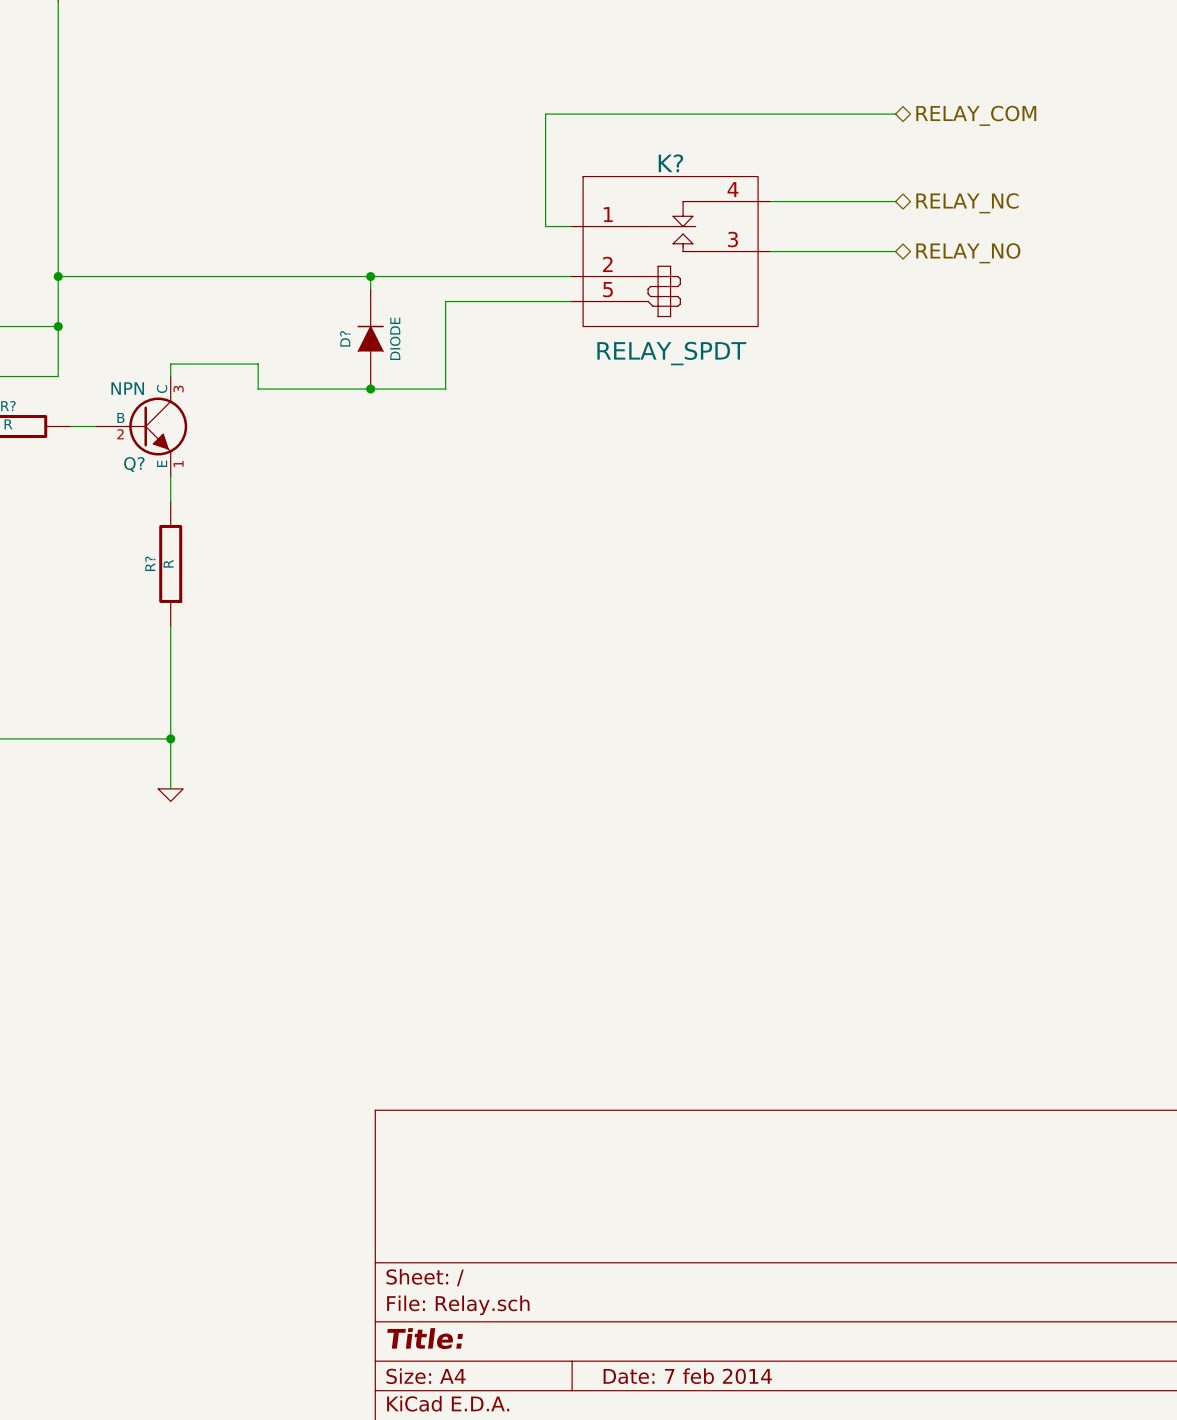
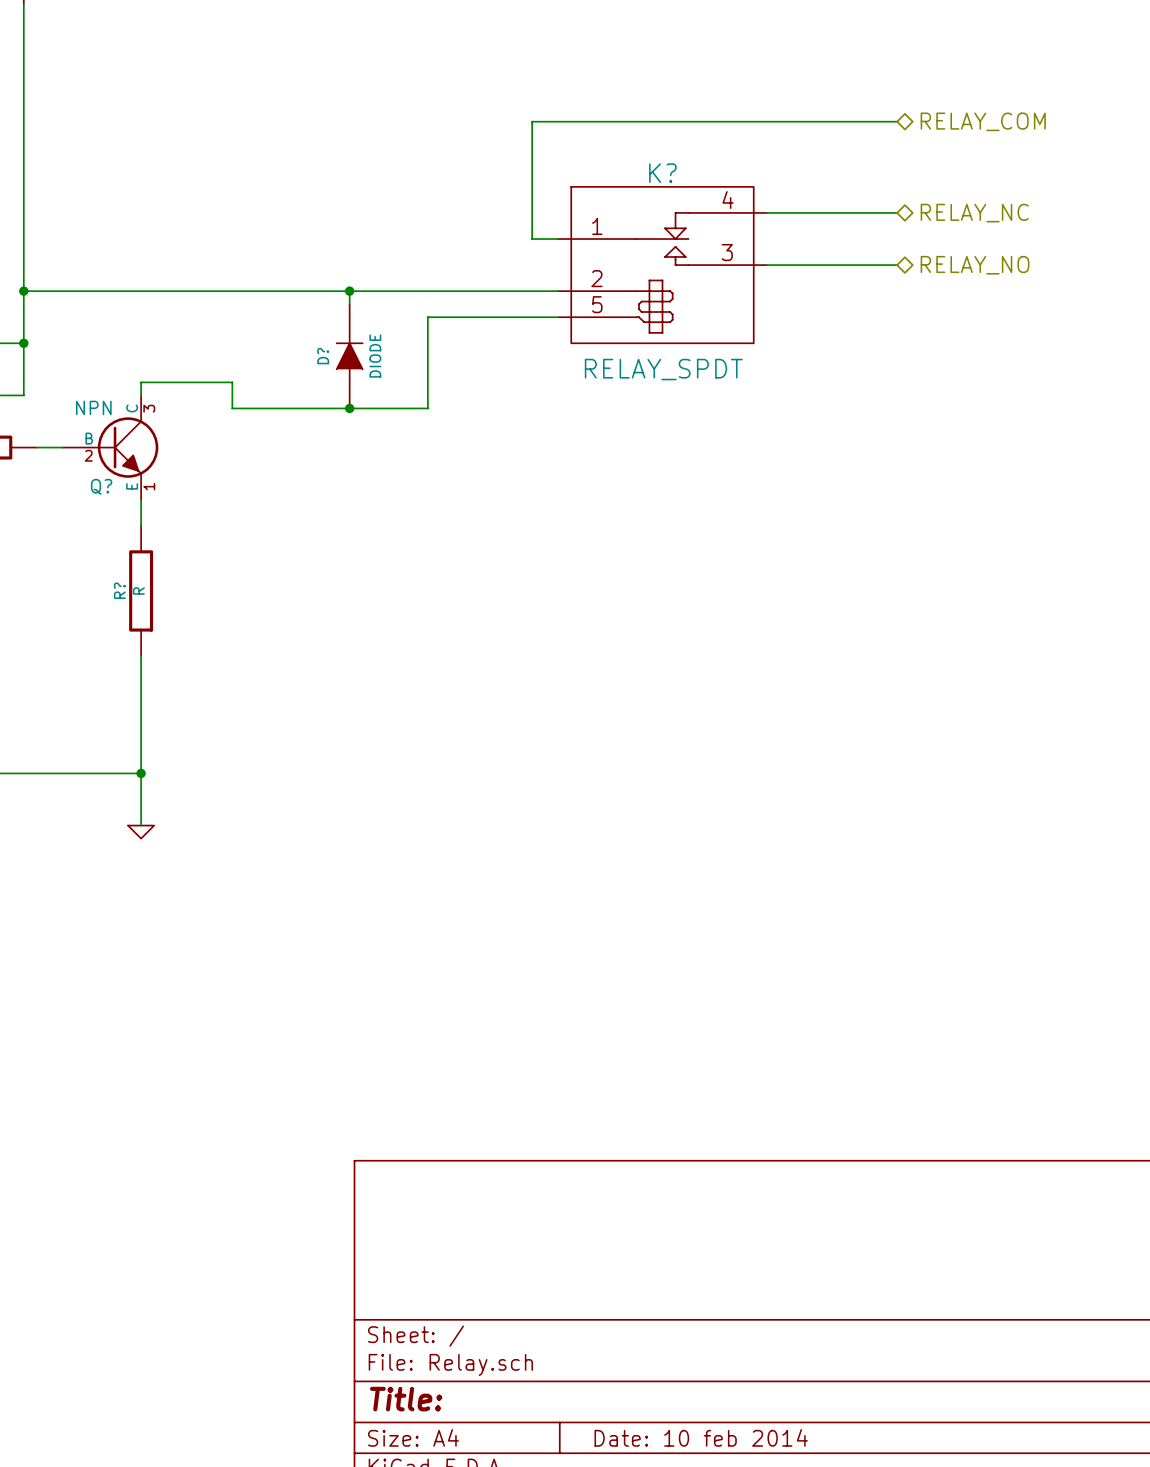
title block: Date: 7 feb 2014 (687, 1376) -> Date: 10 feb 2014 (701, 1437)

